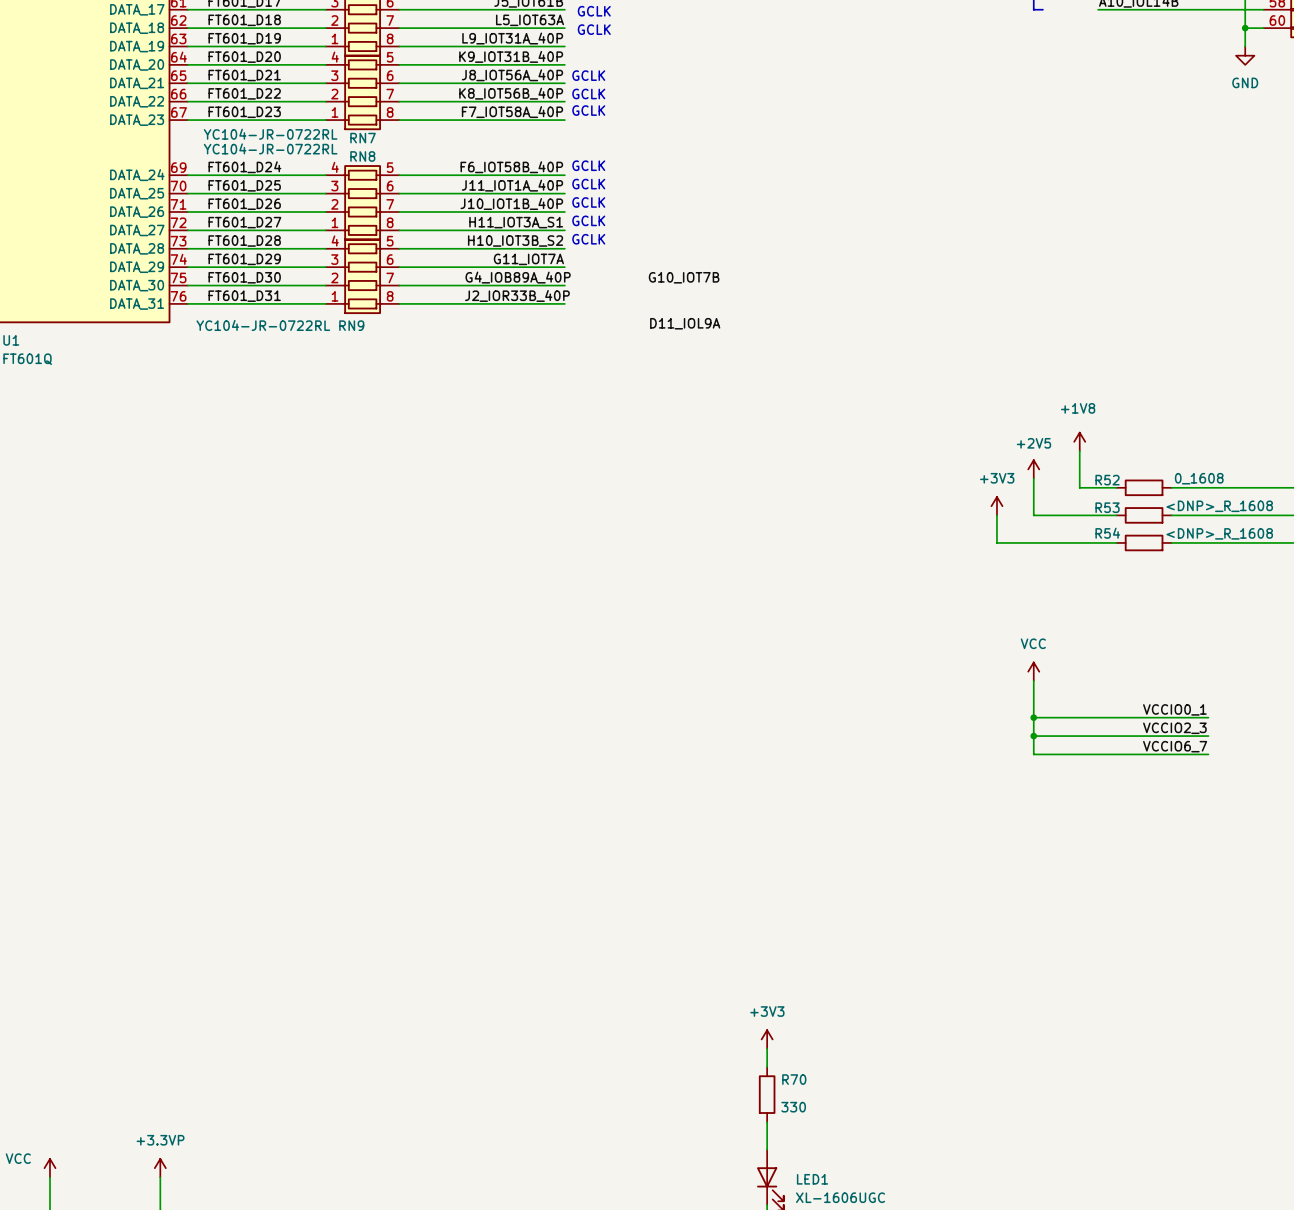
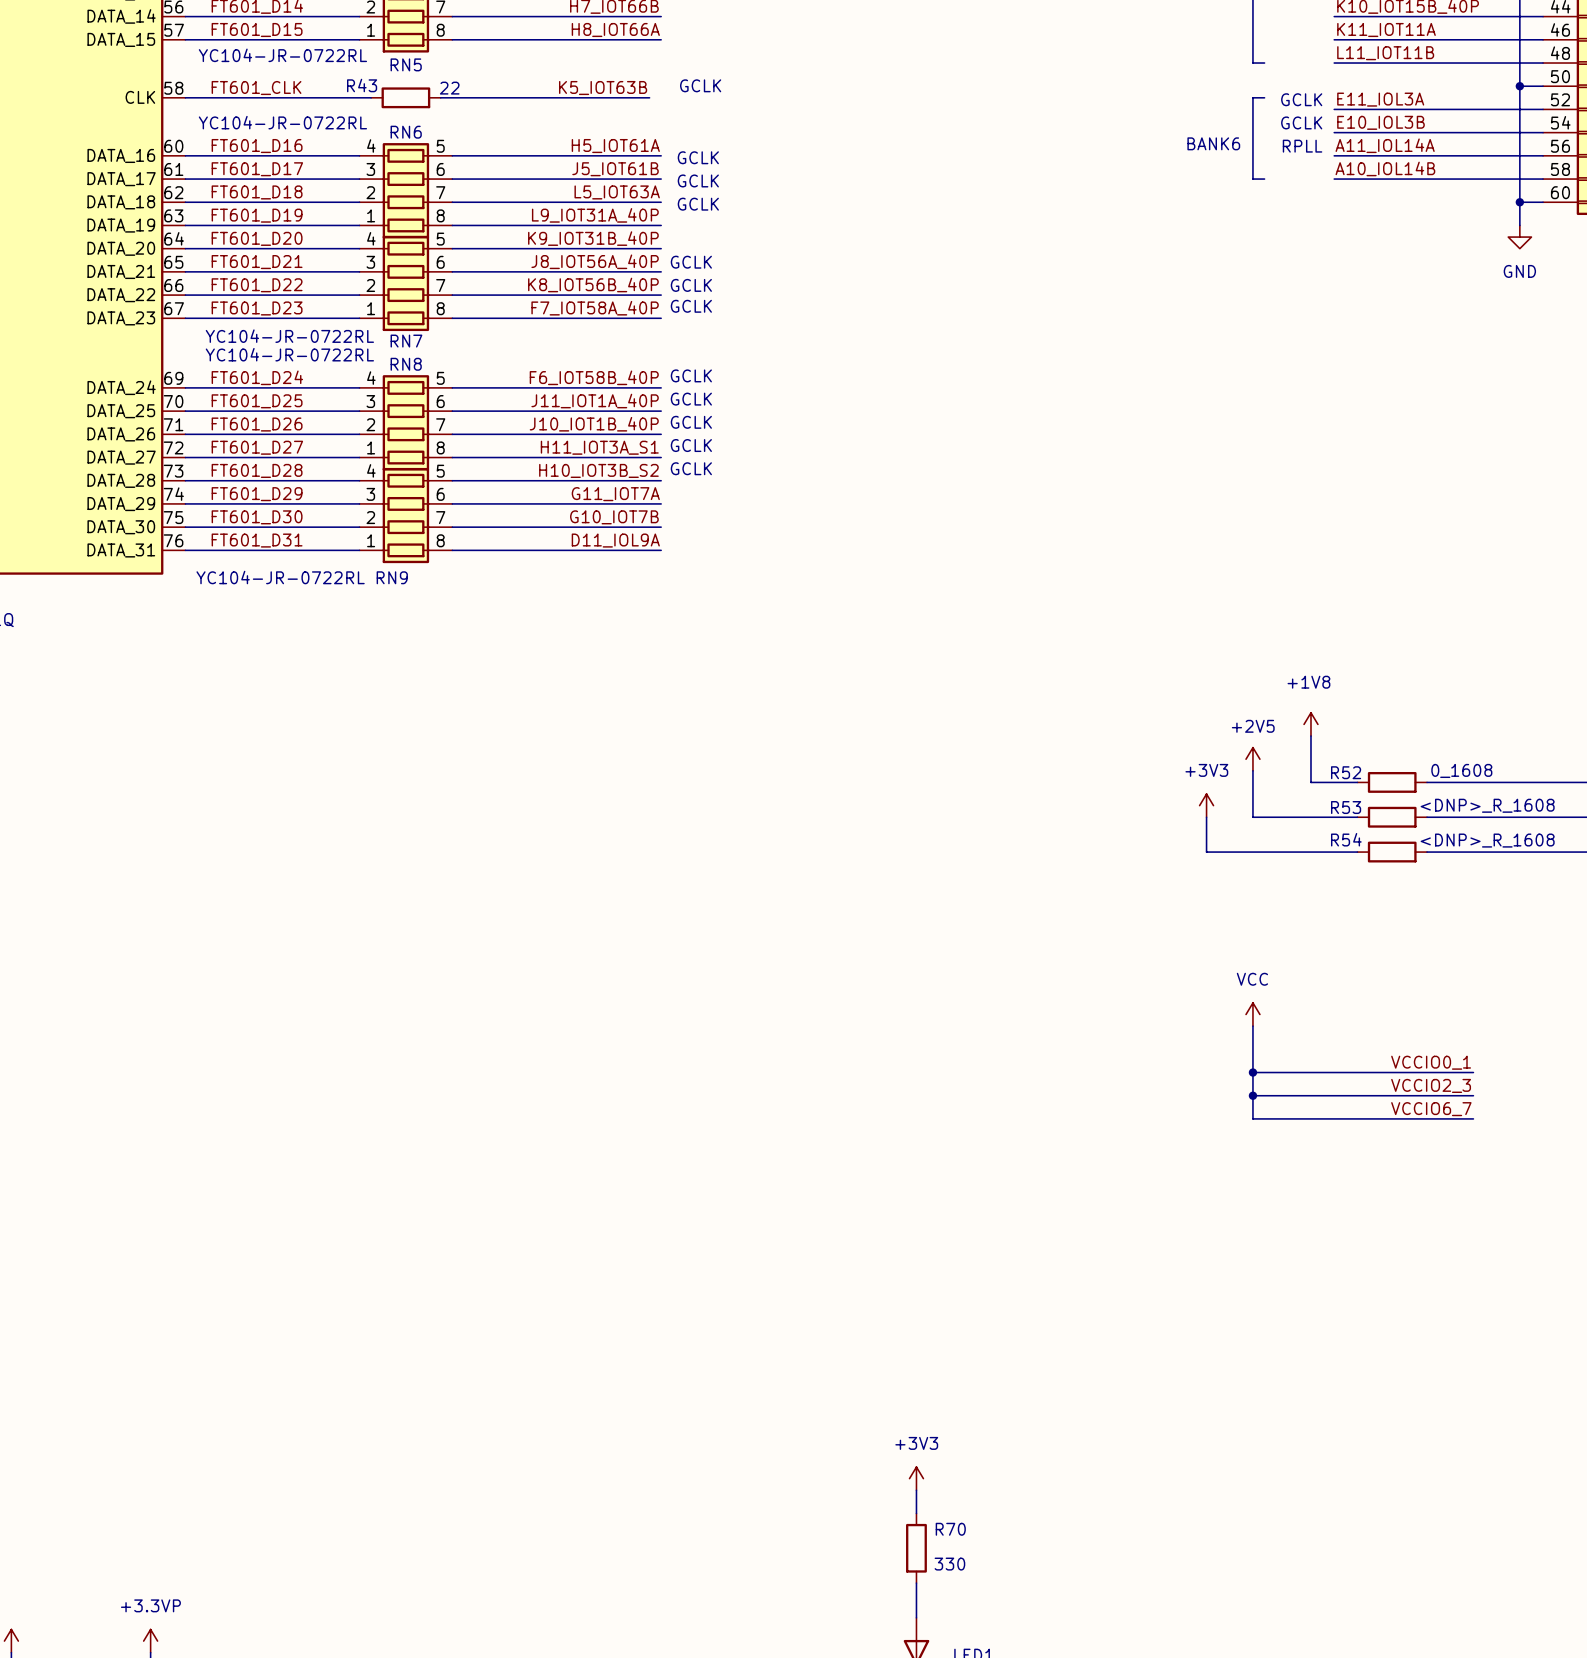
label: G4_IOB89A_40P (518, 277) -> none
label position: G10_IOT7B (684, 277) -> G10_IOT7B (614, 517)
label: J2_IOR33B_40P (517, 295) -> none
label position: D11_IOL9A (685, 323) -> D11_IOL9A (615, 540)

